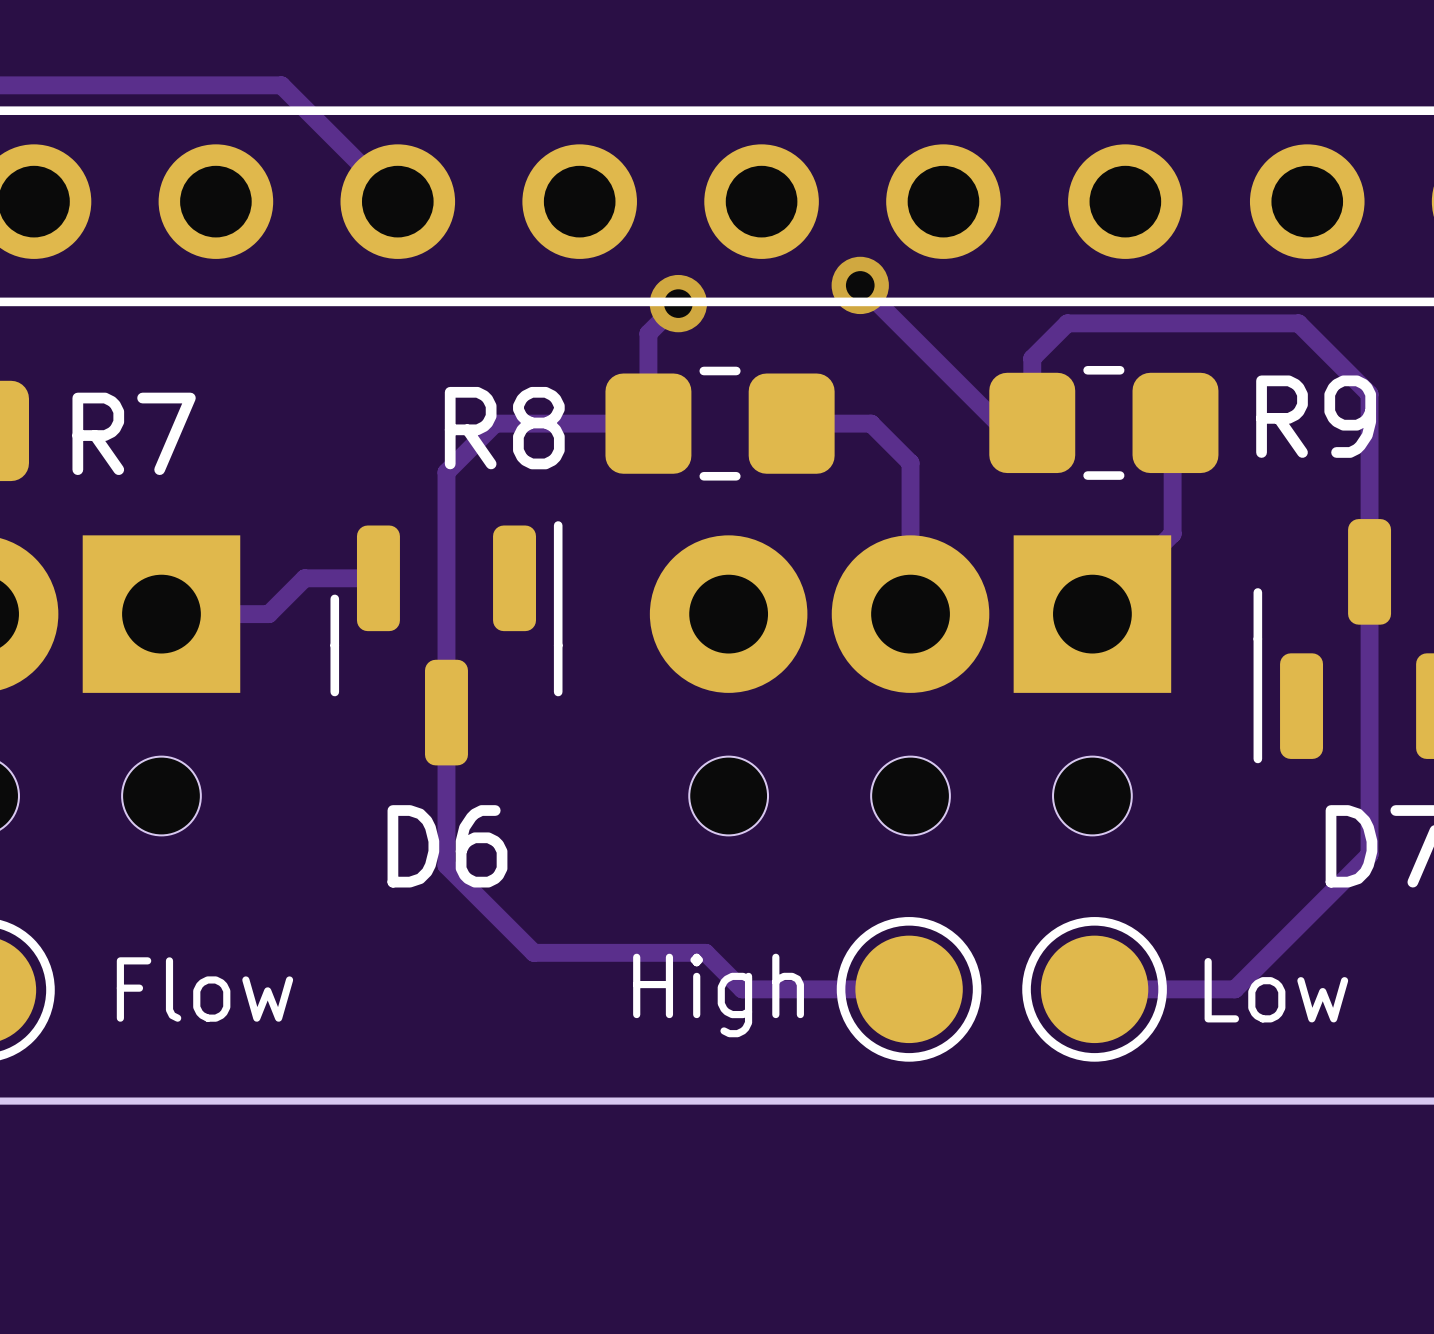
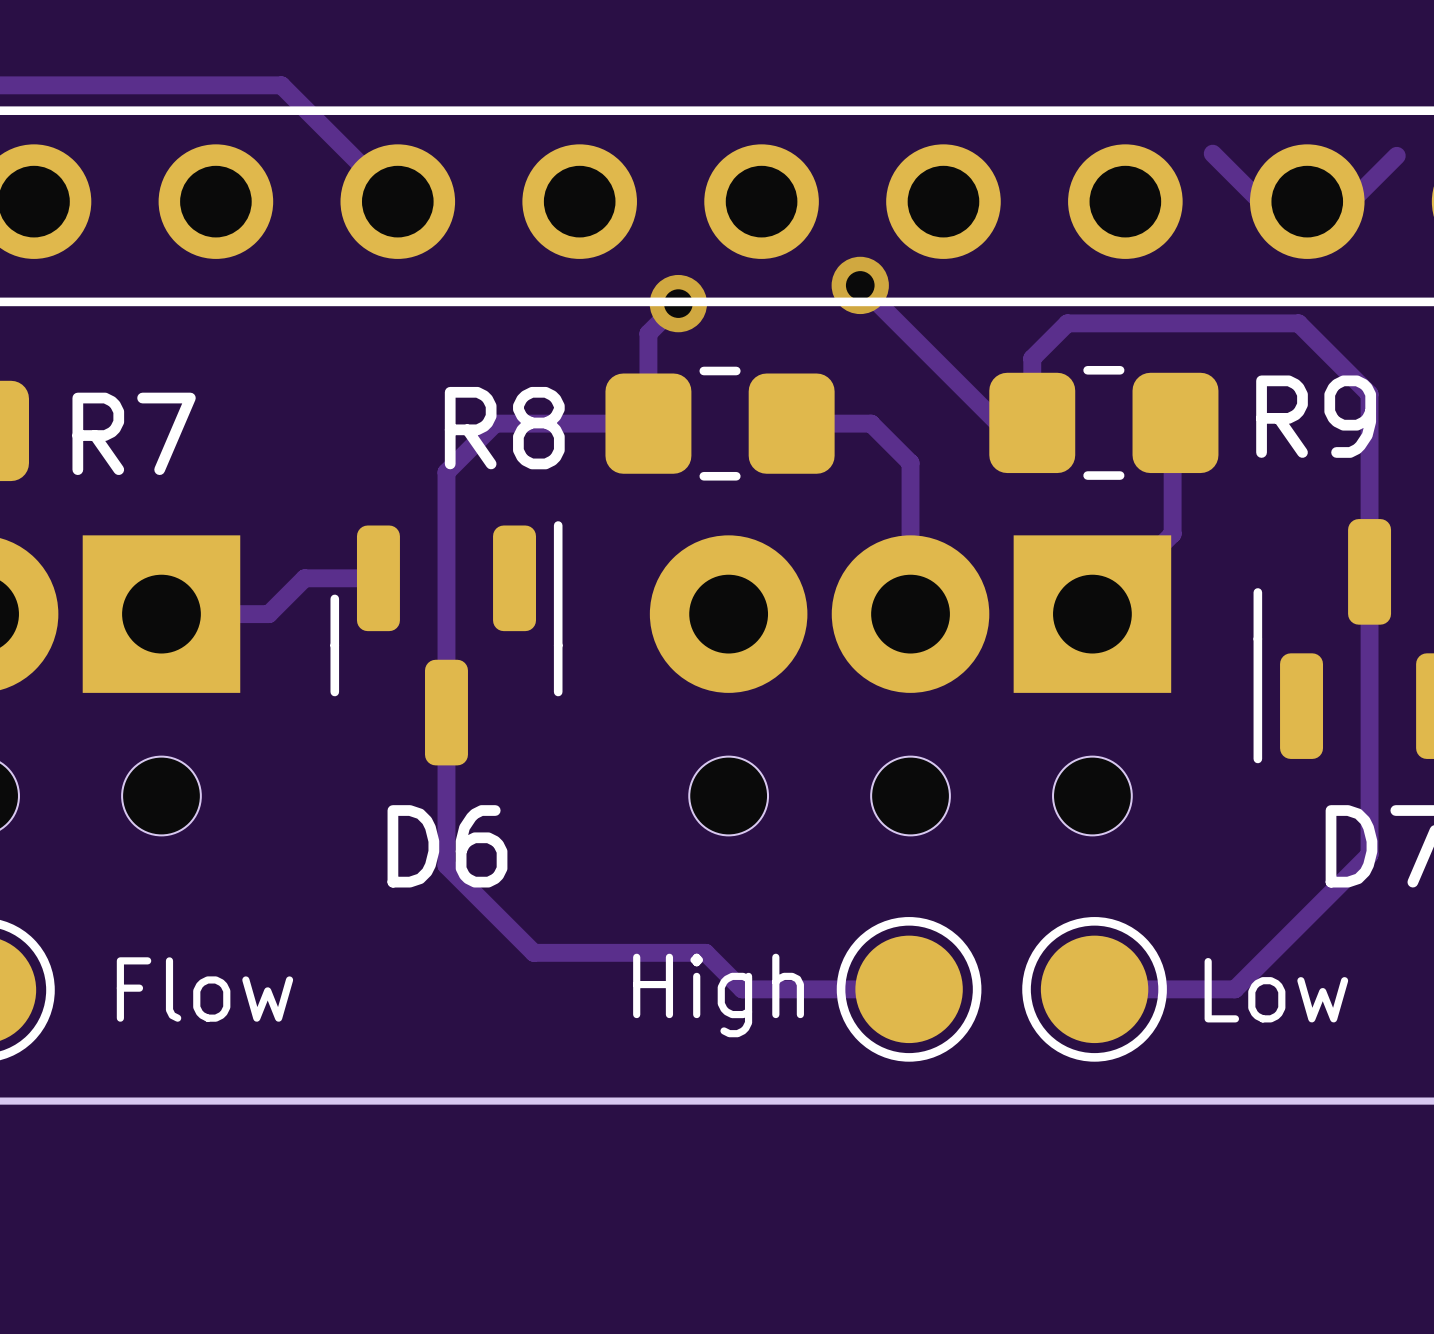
track: none -> (1212, 153) (1260, 201) (1350, 201) (1396, 155)

